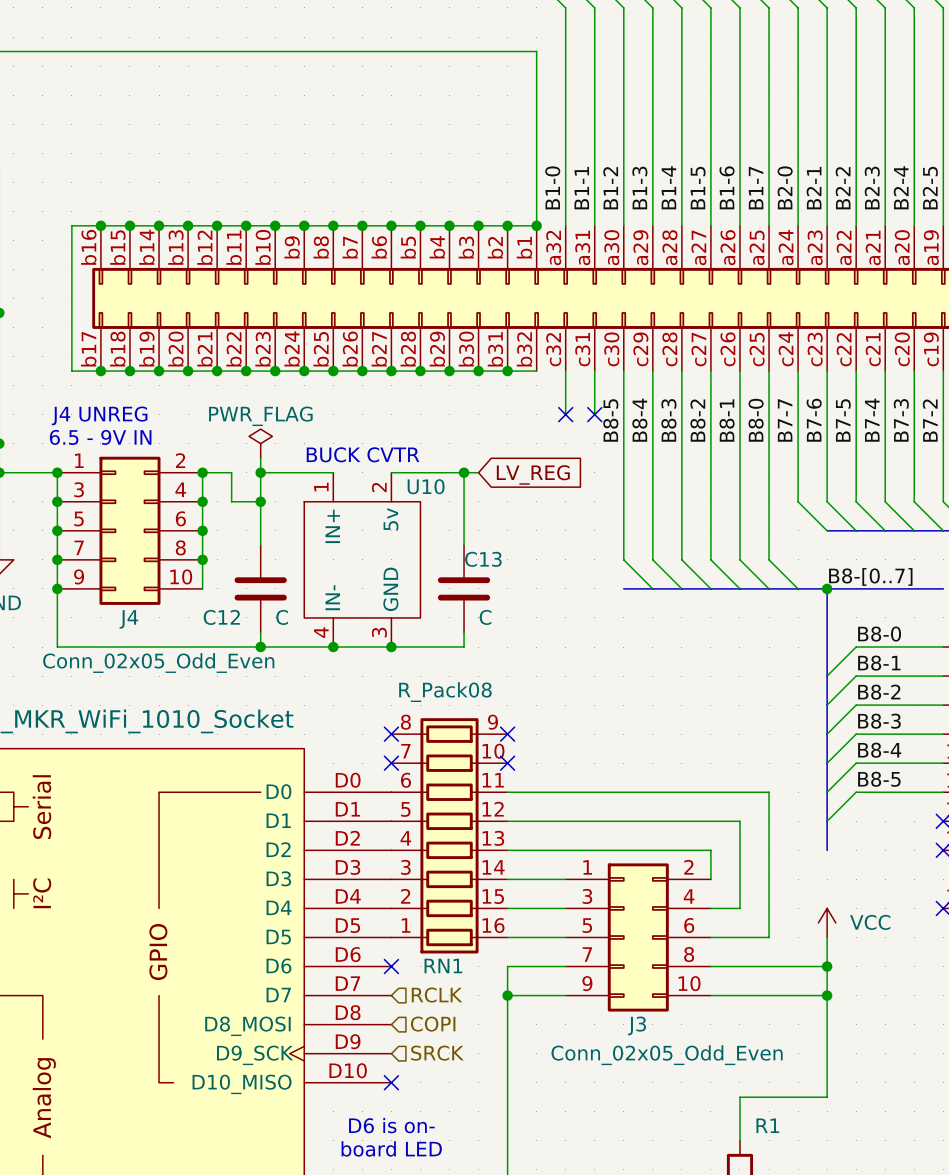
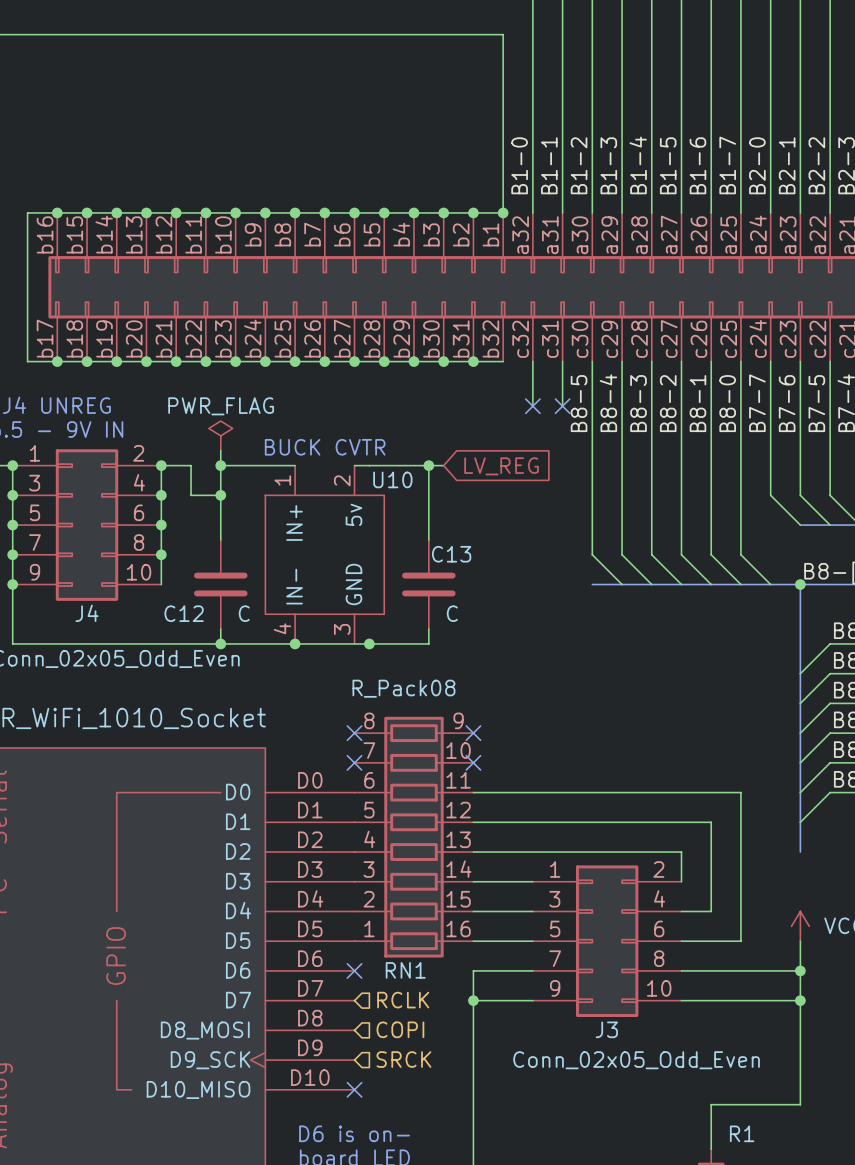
junction position: (391, 647) -> (369, 643)

